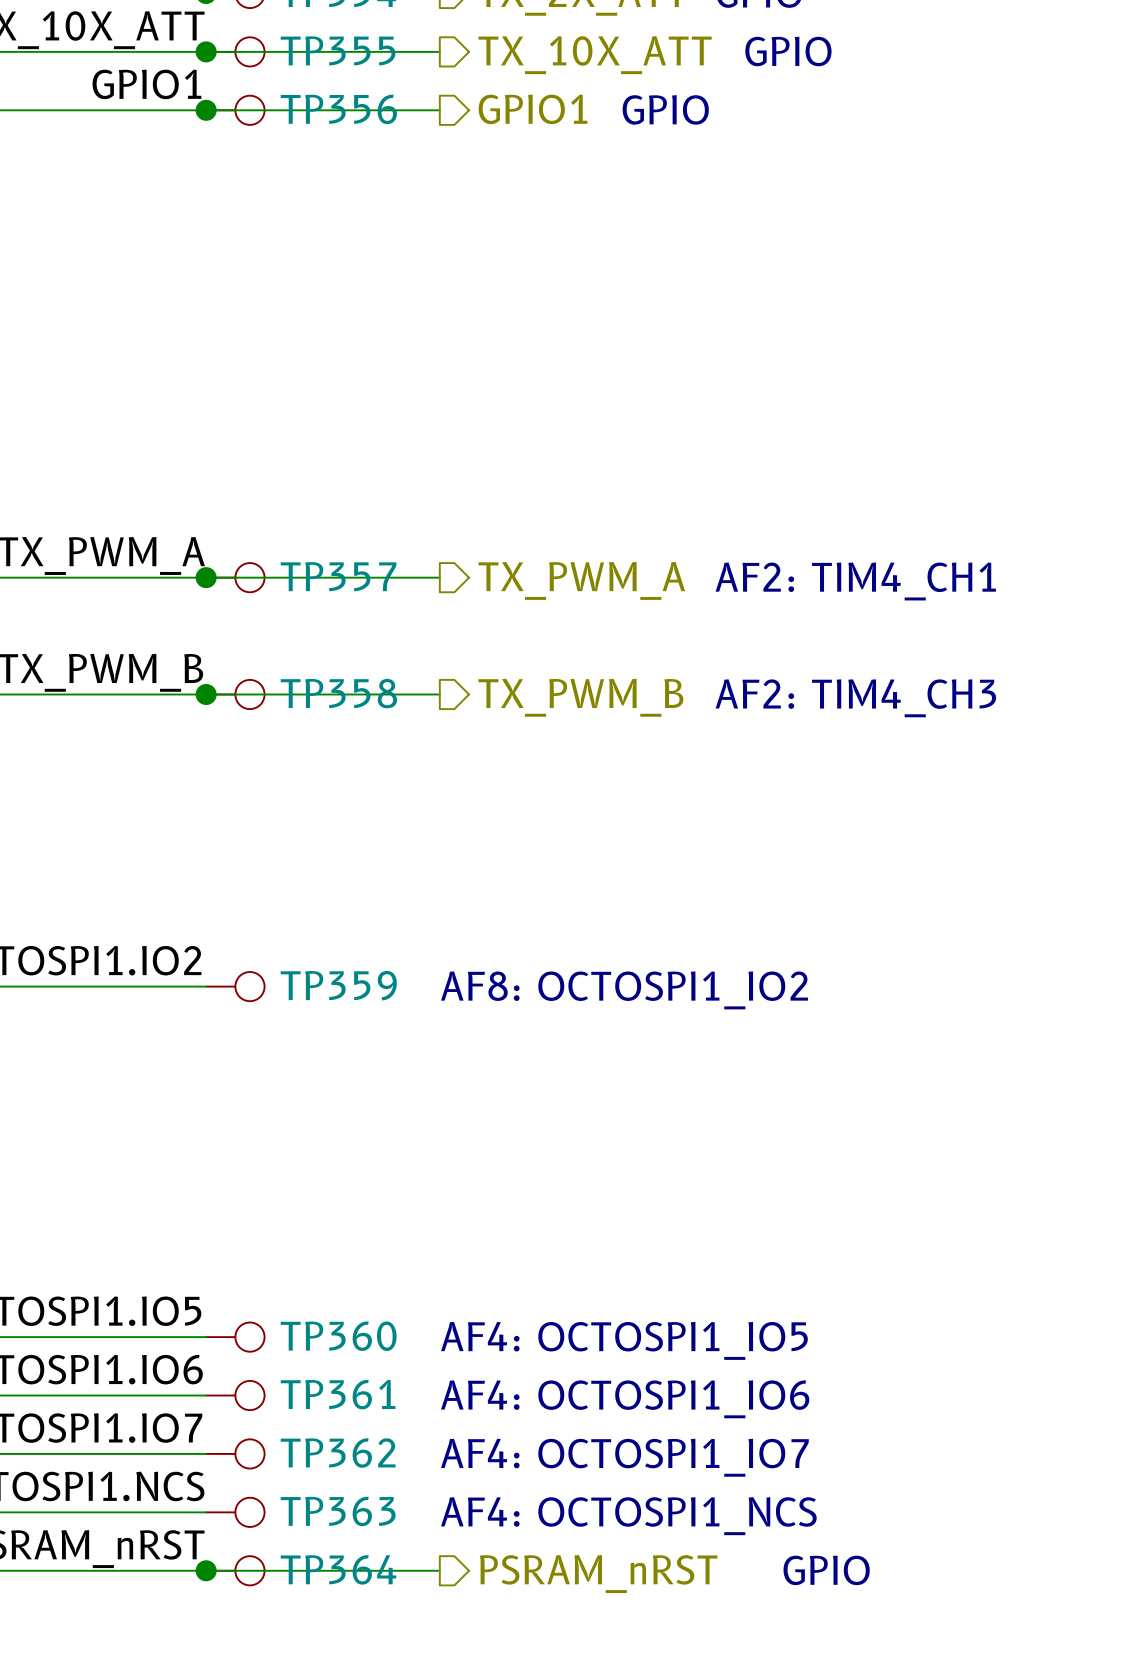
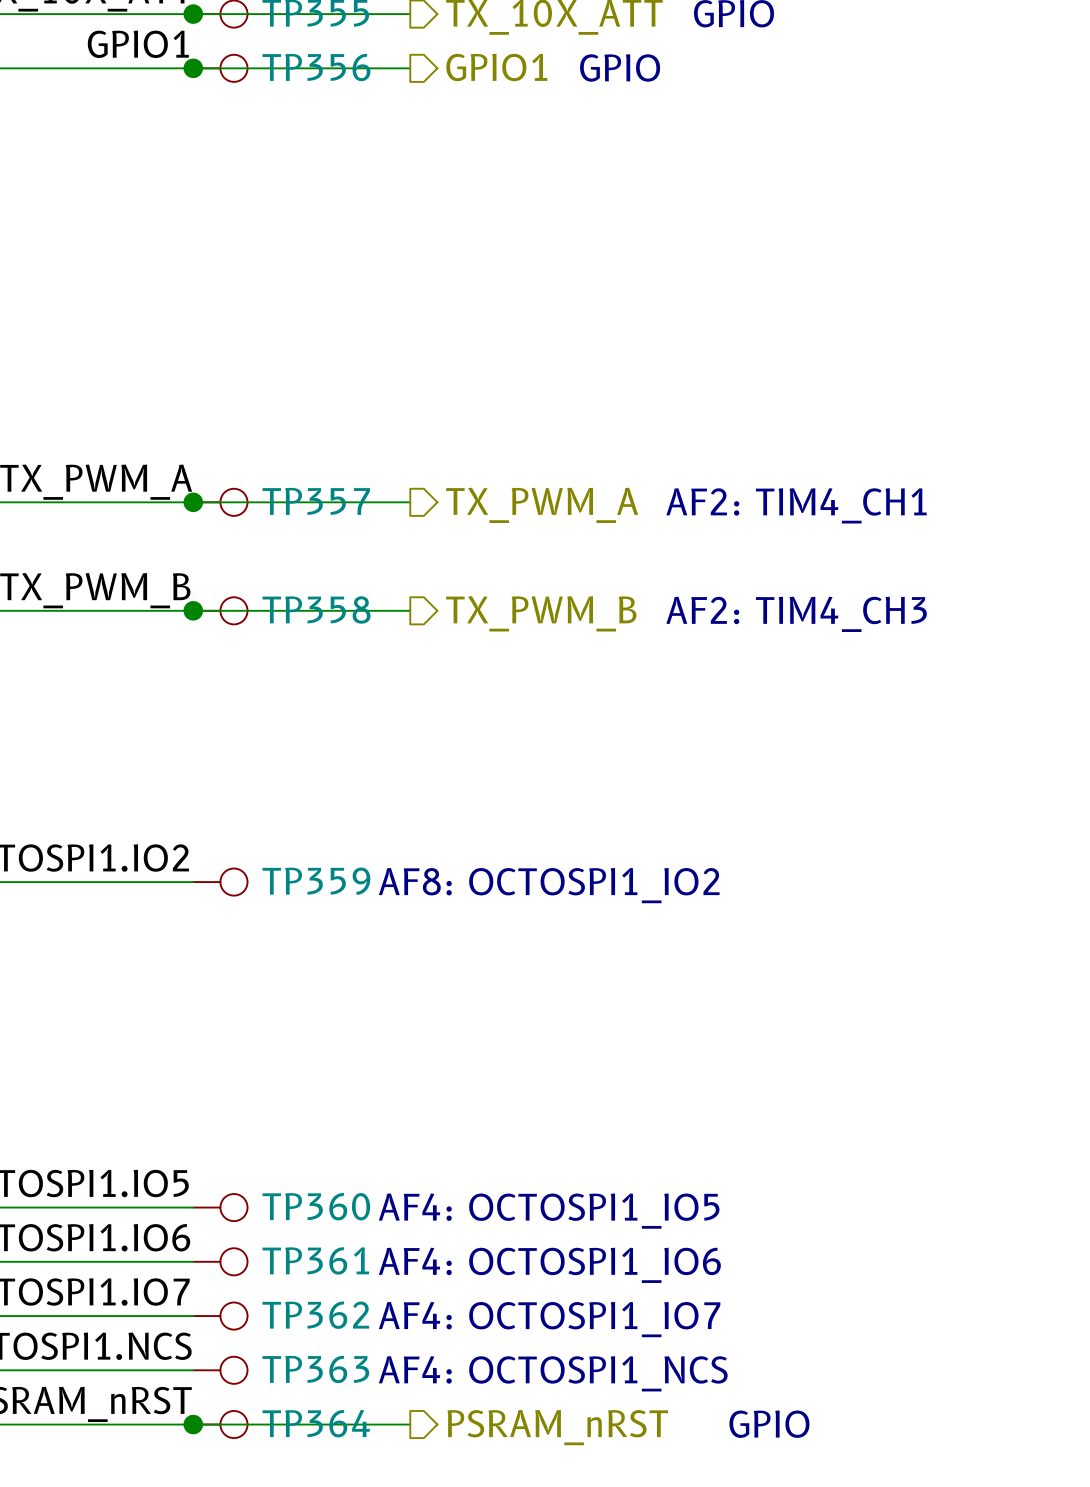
text position: AF8: OCTOSPI1_IO2 (624, 990) -> AF8: OCTOSPI1_IO2 (549, 885)
text position: AF4: OCTOSPI1_IO5 (624, 1340) -> AF4: OCTOSPI1_IO5 (549, 1211)
text position: AF4: OCTOSPI1_IO6 (625, 1399) -> AF4: OCTOSPI1_IO6 (549, 1265)
text position: AF4: OCTOSPI1_IO7 (624, 1457) -> AF4: OCTOSPI1_IO7 (549, 1319)
text position: AF4: OCTOSPI1_NCS (628, 1516) -> AF4: OCTOSPI1_NCS (553, 1373)

